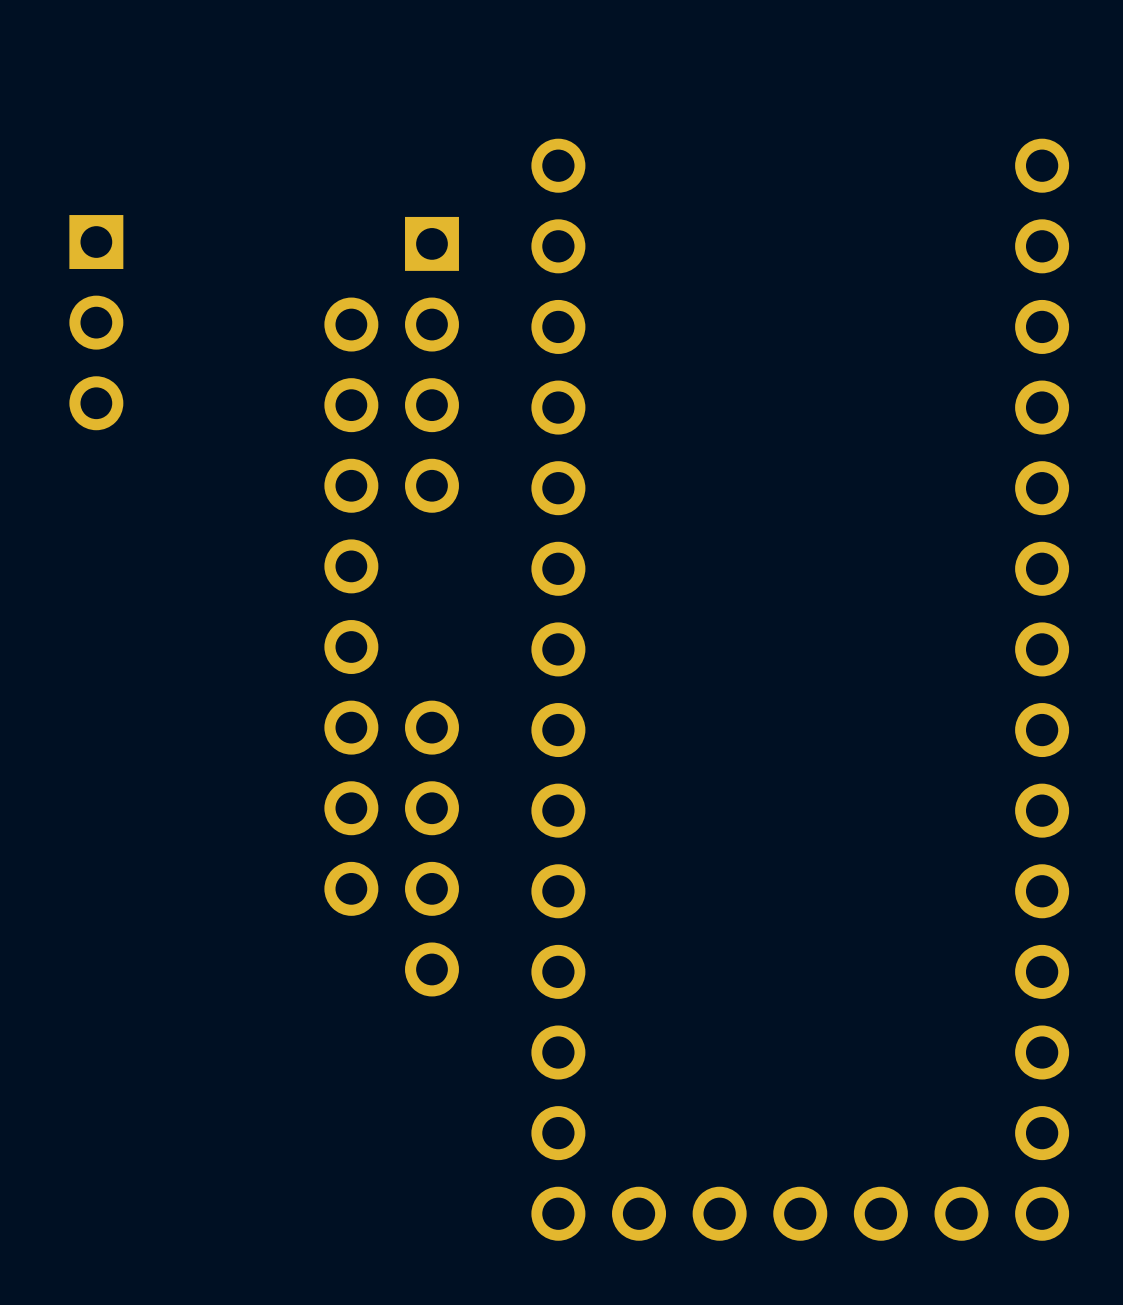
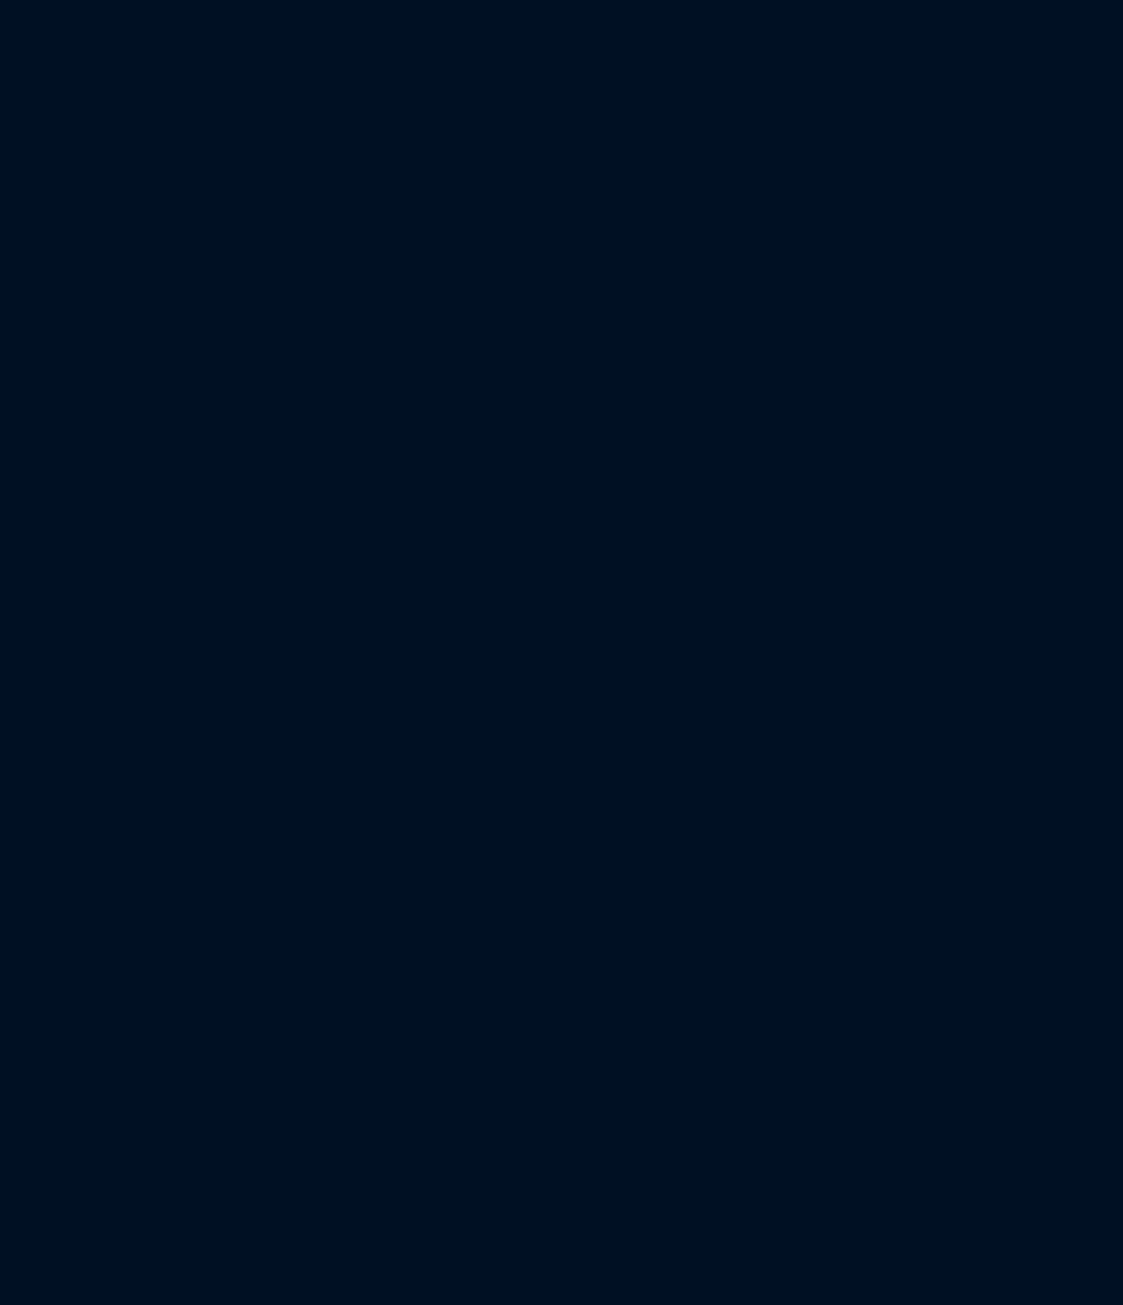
part: (96, 322) -> none
part: (391, 606) -> none
part: (800, 689) -> none

